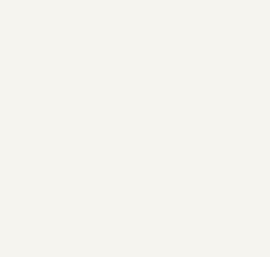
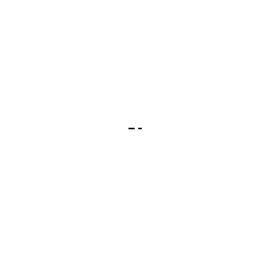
line: none -> (128, 128) (141, 128)

